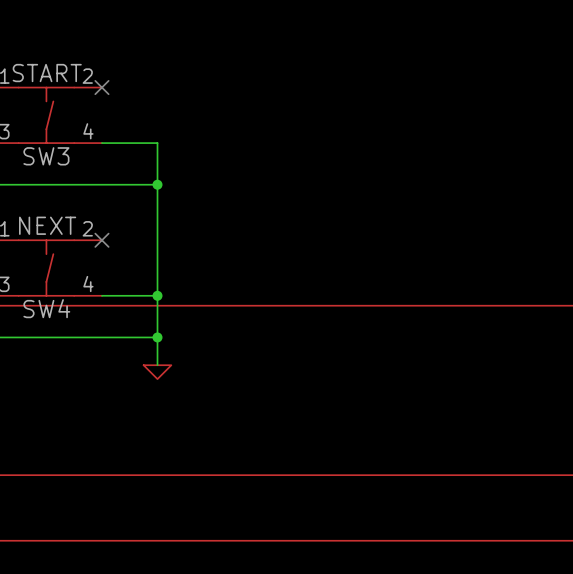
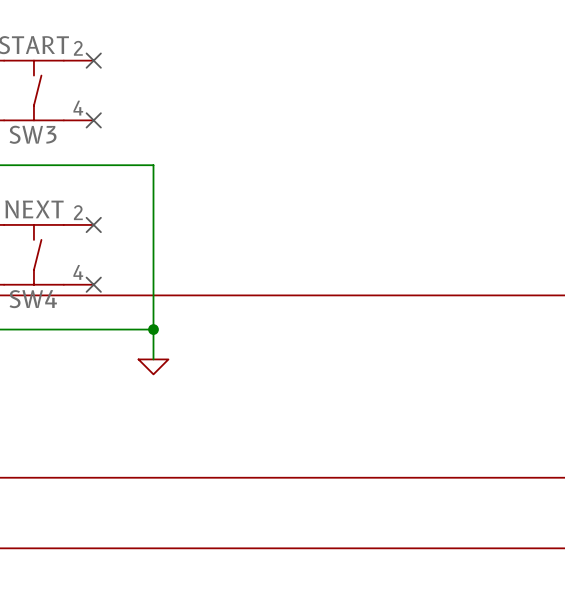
wire: (101, 143) (157, 143) (157, 184) -> none
no-connect mark: none -> (93, 120)
junction: (157, 184) -> none
wire: (101, 295) (157, 295) -> none
no-connect mark: none -> (93, 284)
junction: (157, 295) -> none

